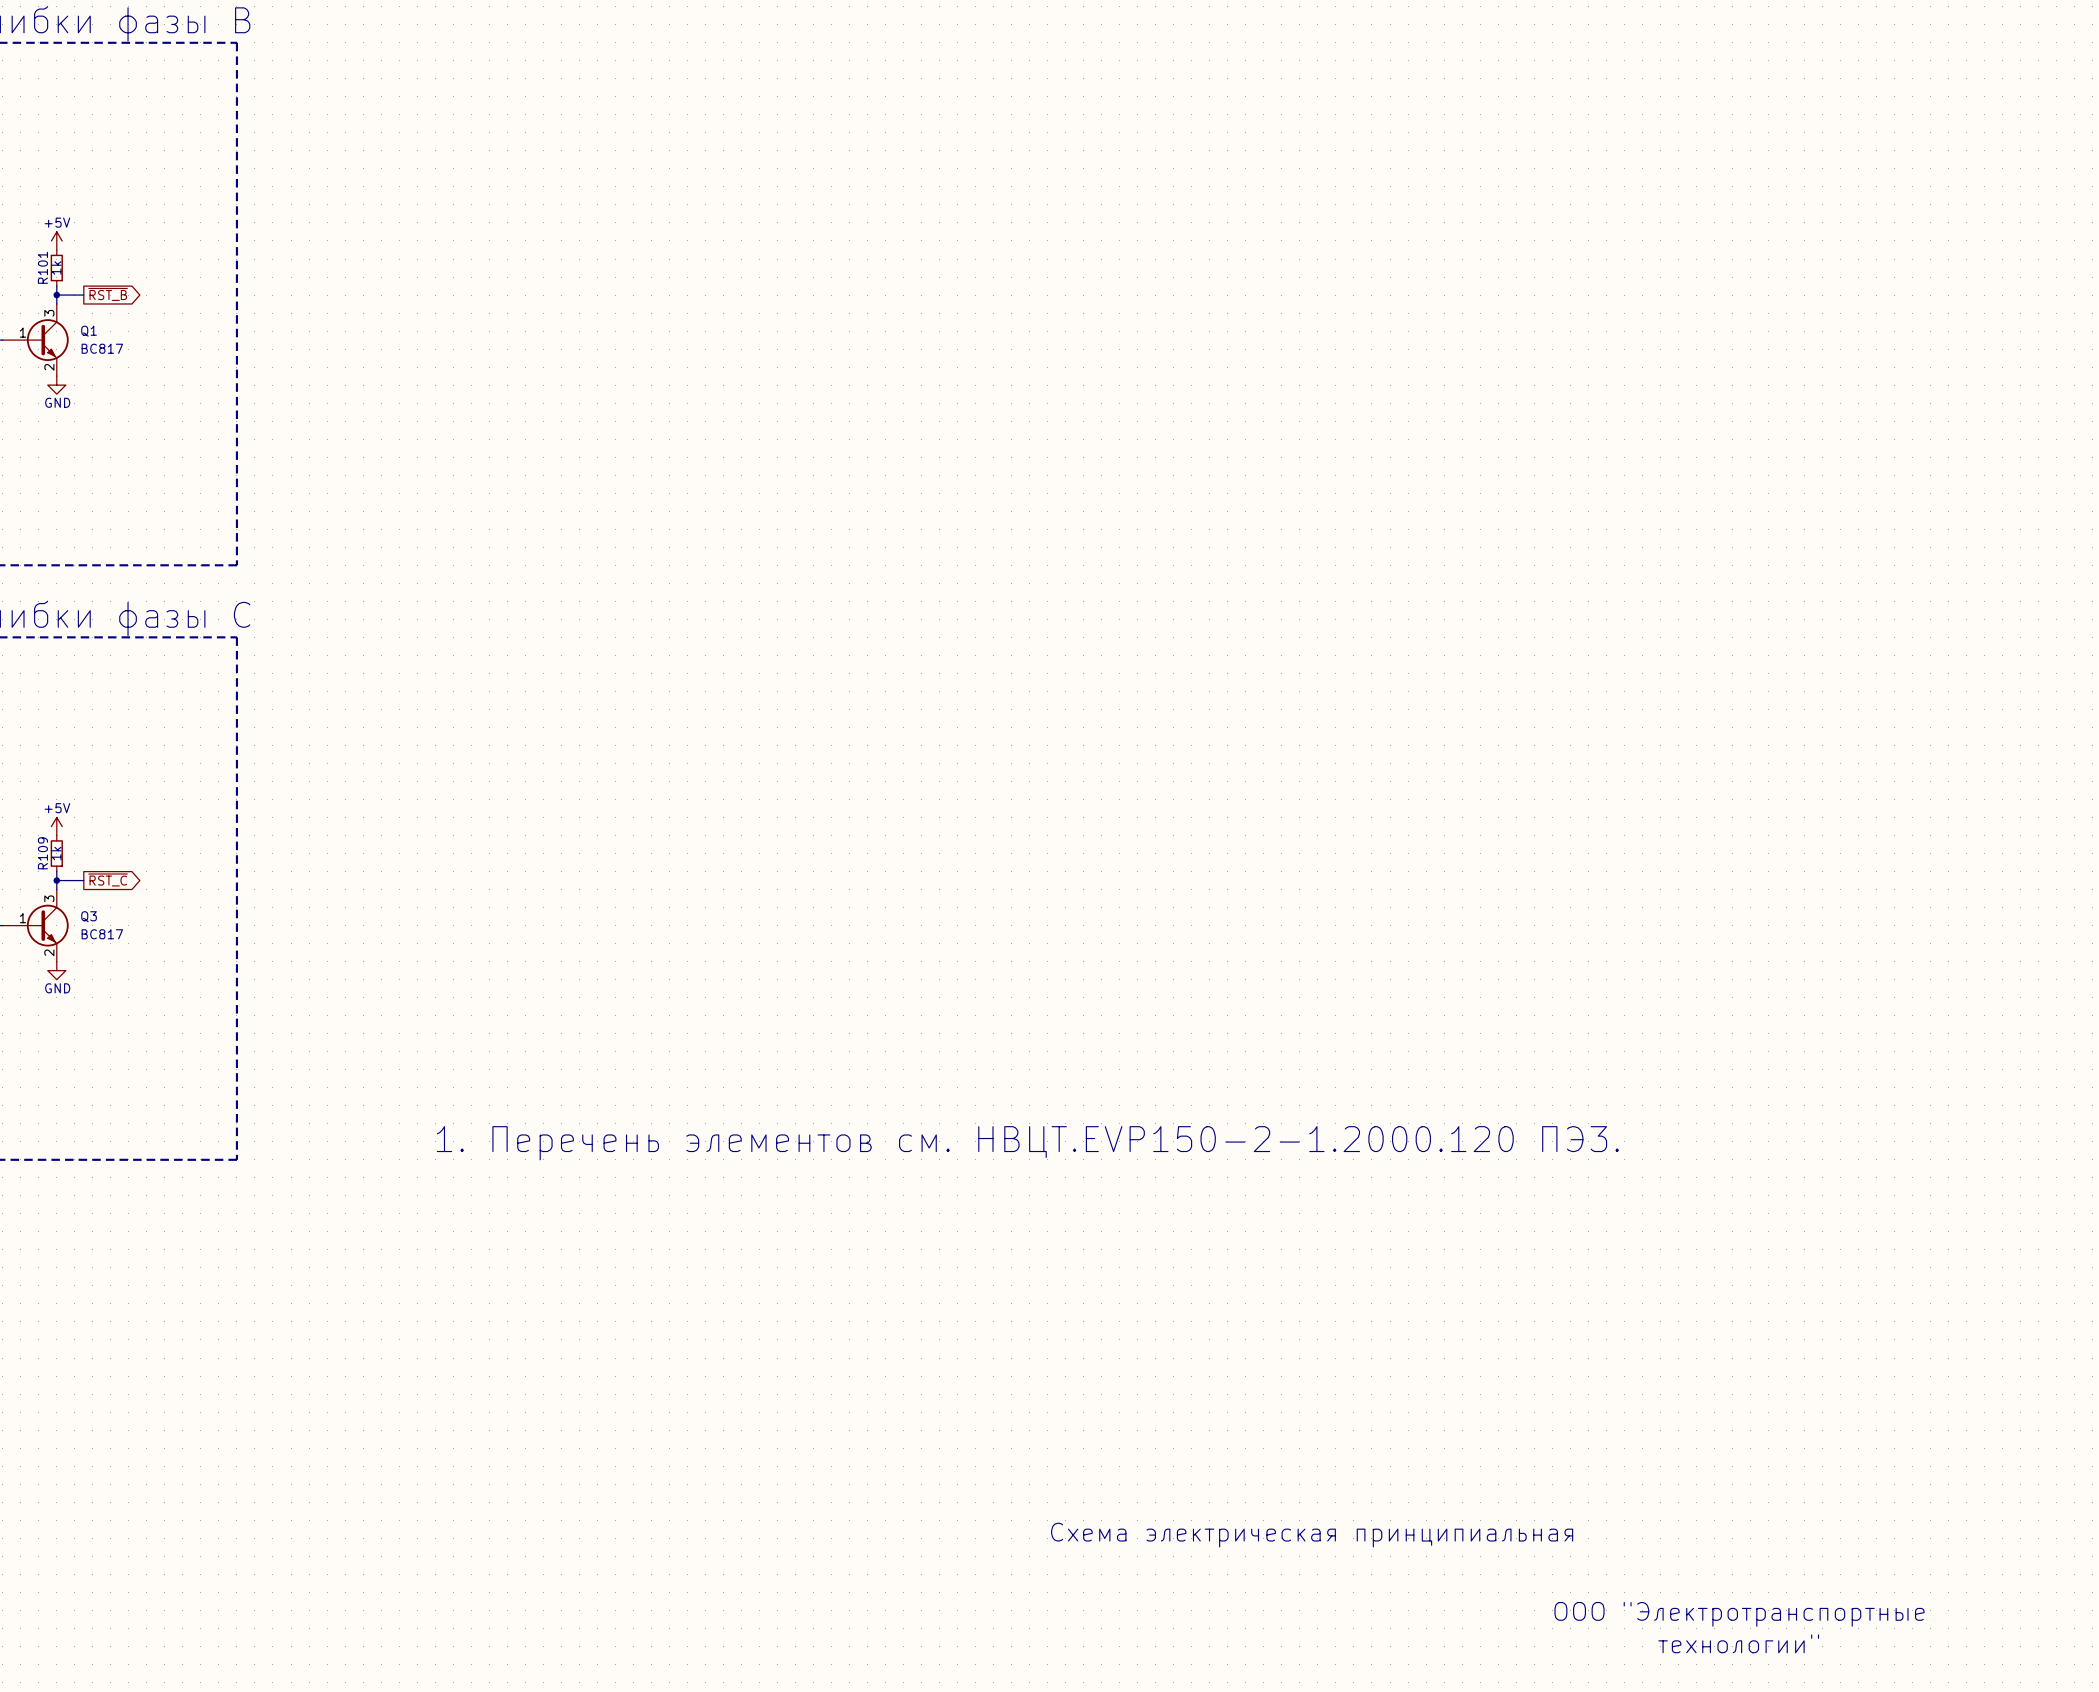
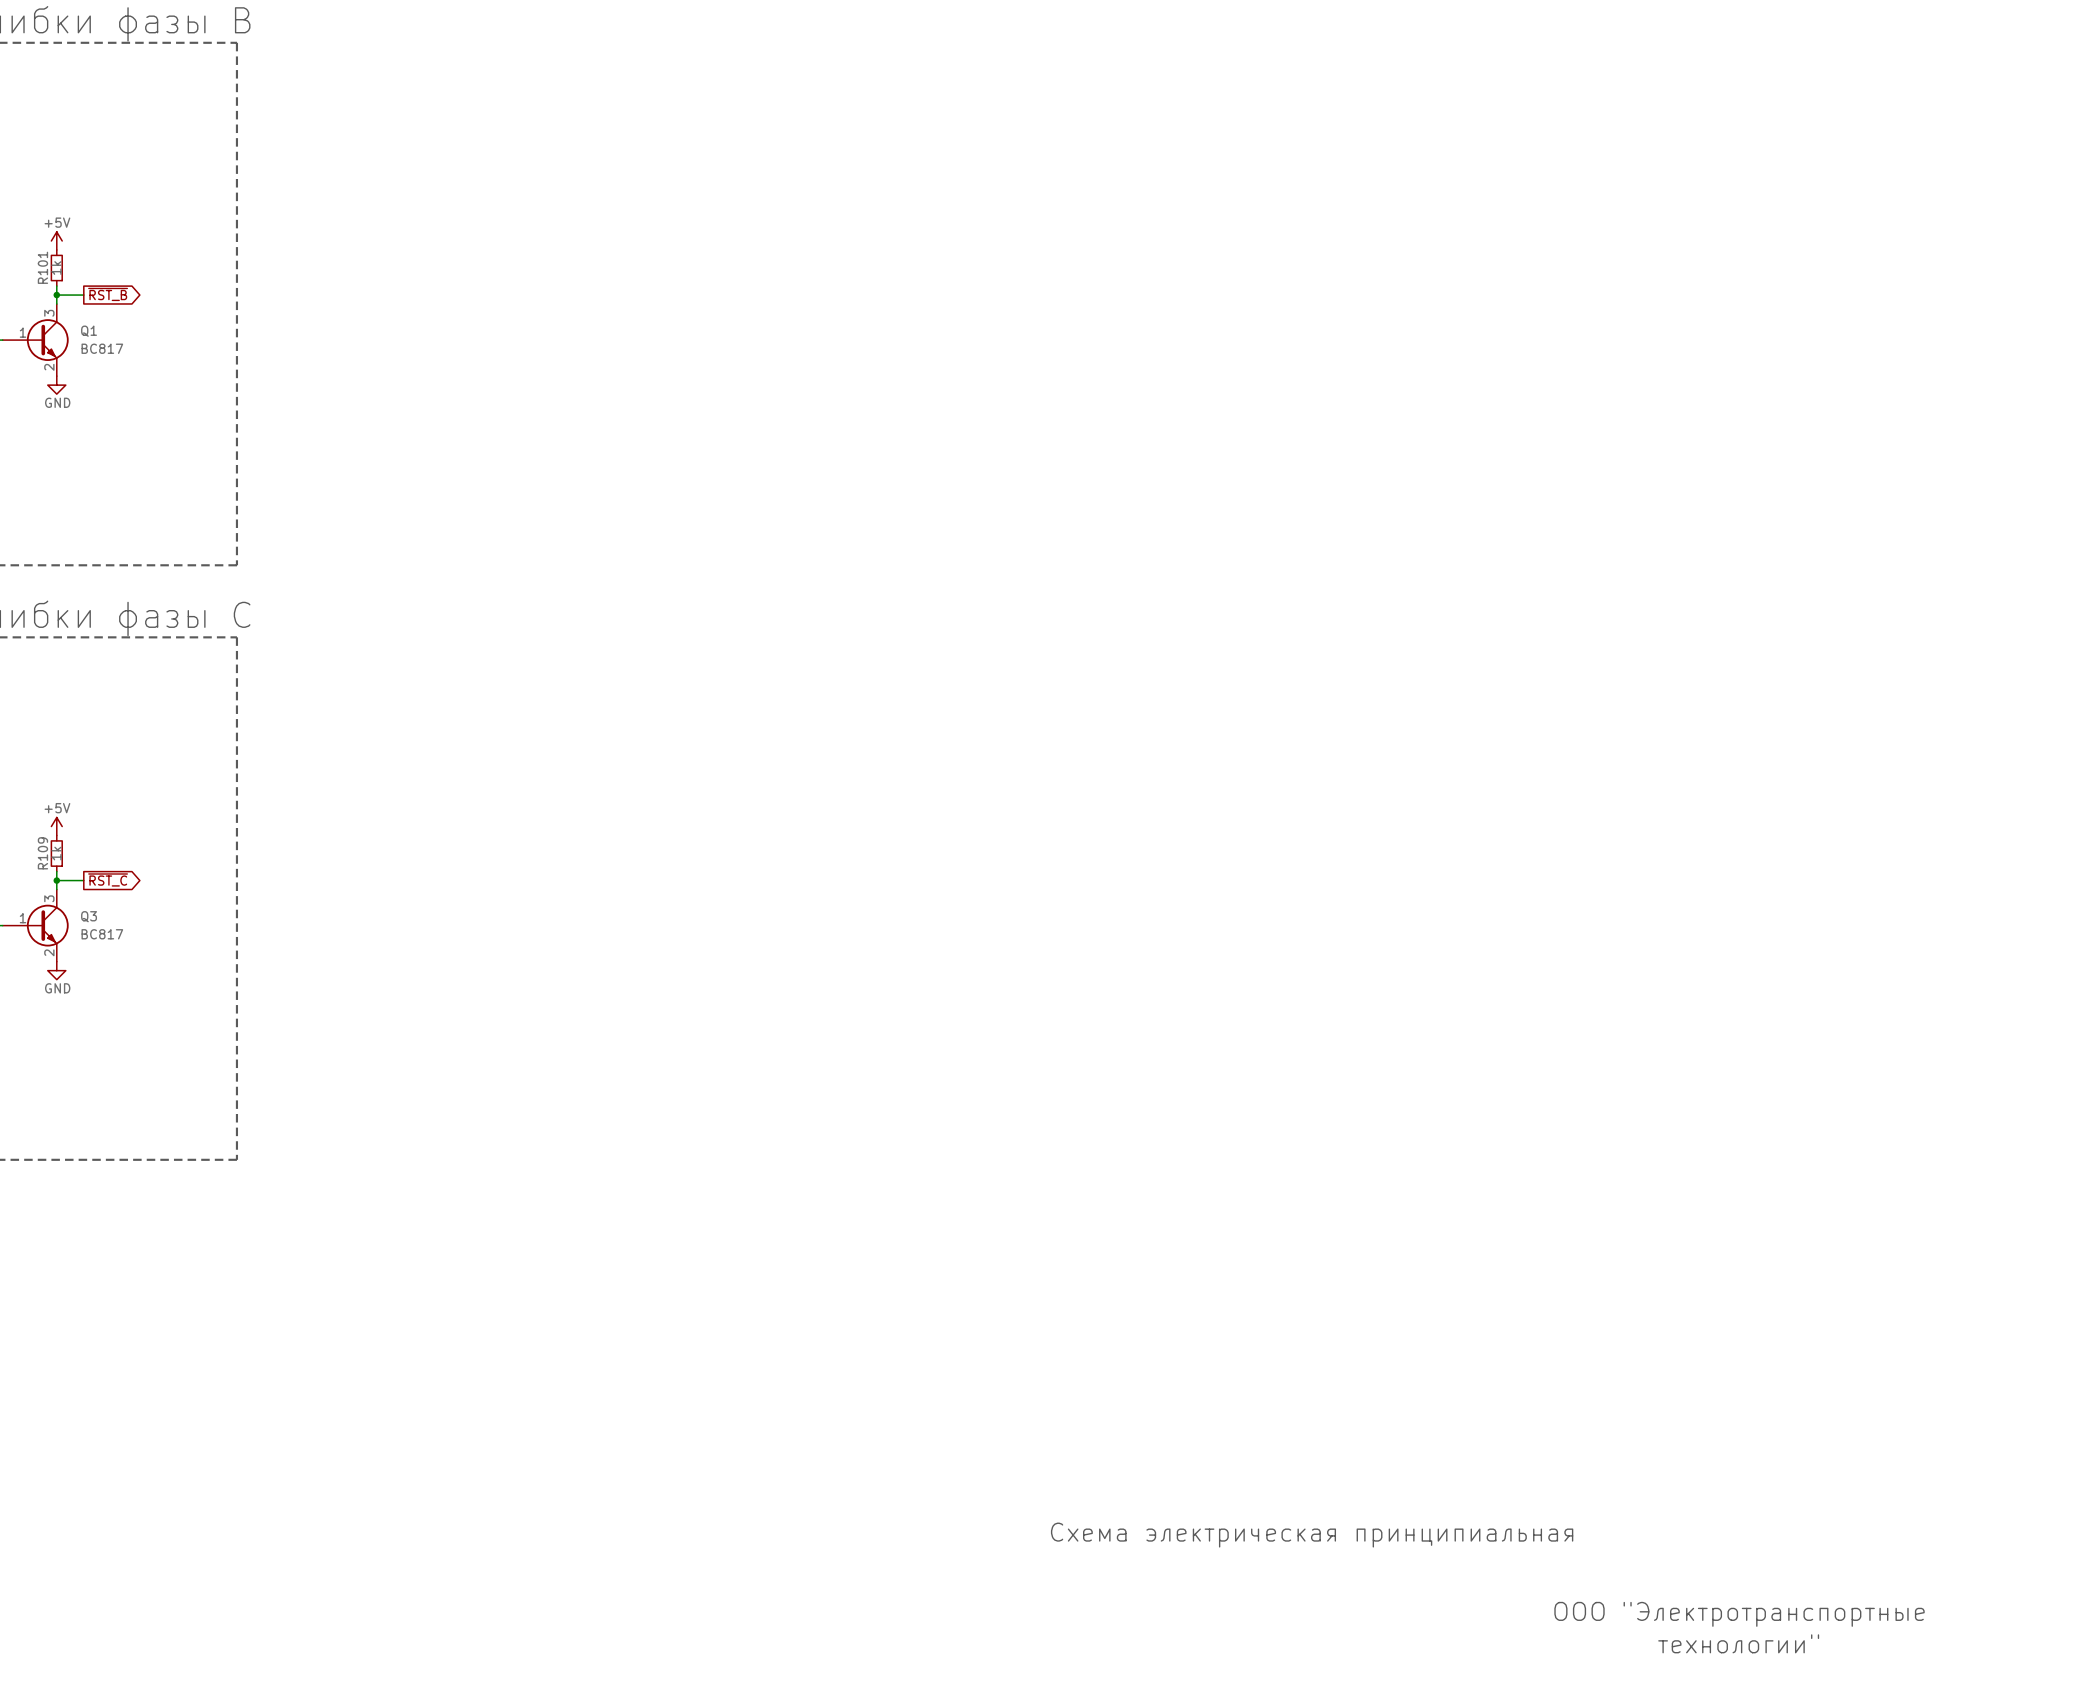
text: 1. Перечень элементов см. НВЦТ.EVP150-2-1.2000.120 ПЭ3. (1027, 1143) -> none

